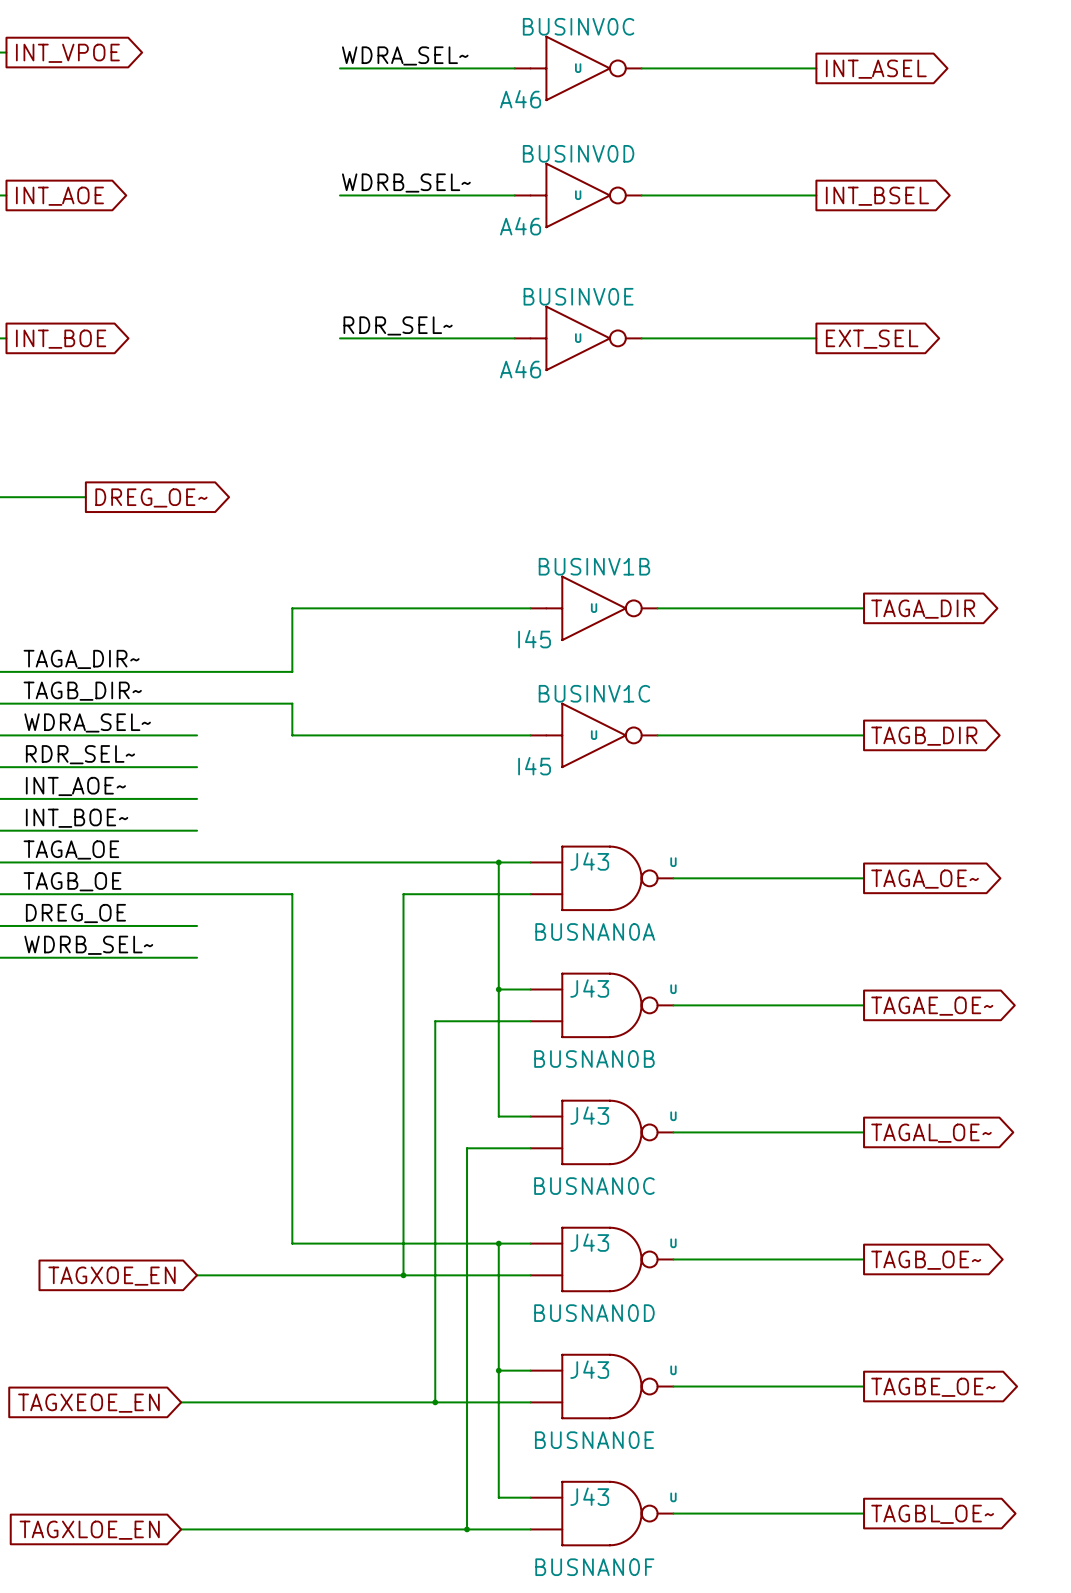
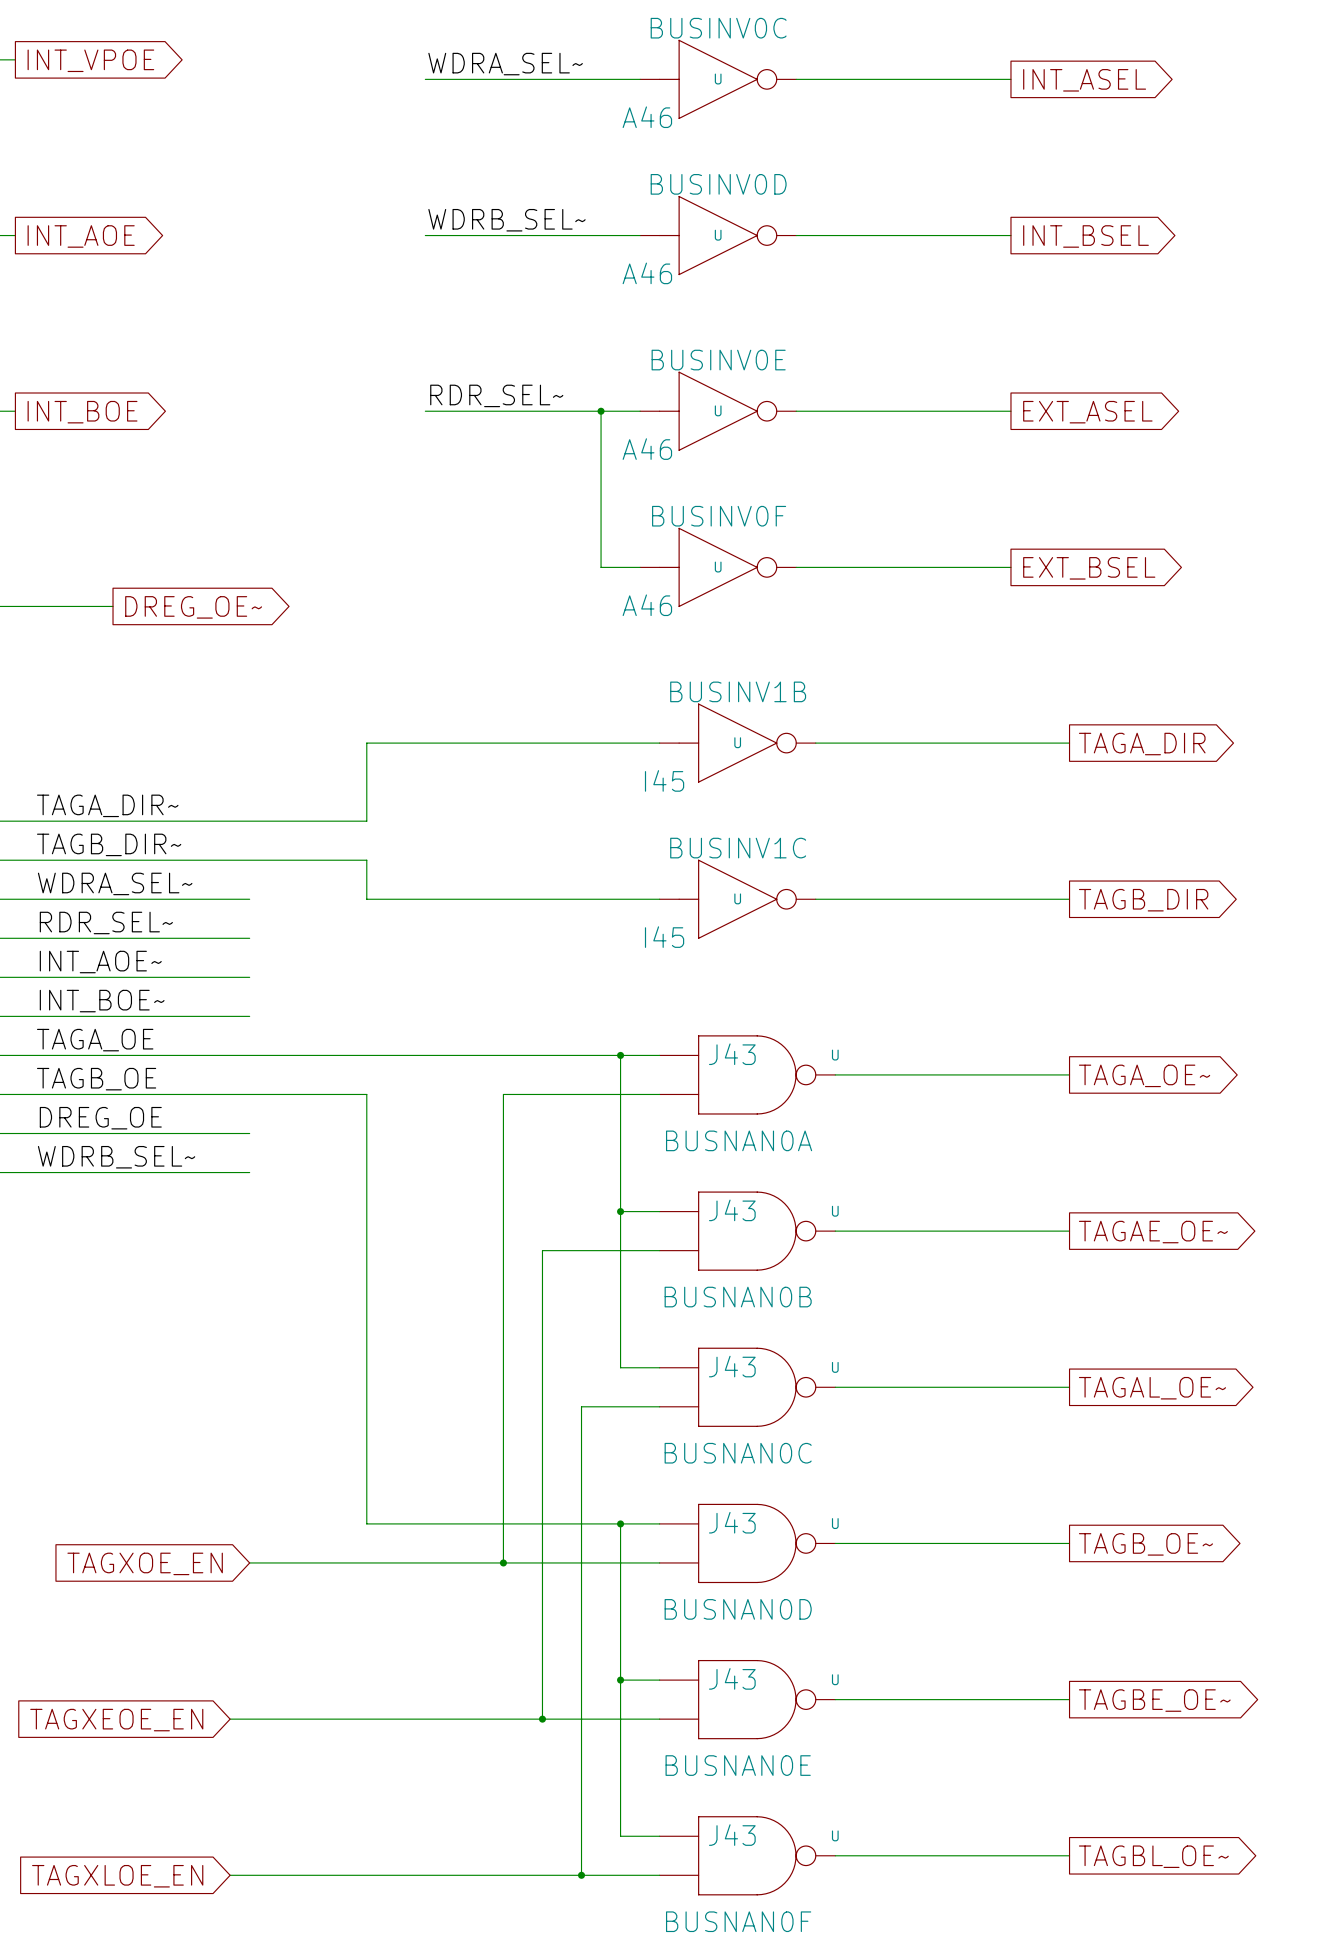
wire: none -> (601, 411) (601, 567) (640, 567)
junction: none -> (601, 411)
global label: EXT_SEL (872, 339) -> EXT_ASEL (1087, 412)
U: none -> (718, 567)
wire: none -> (796, 567) (1010, 567)
global label: none -> EXT_BSEL (1089, 568)

